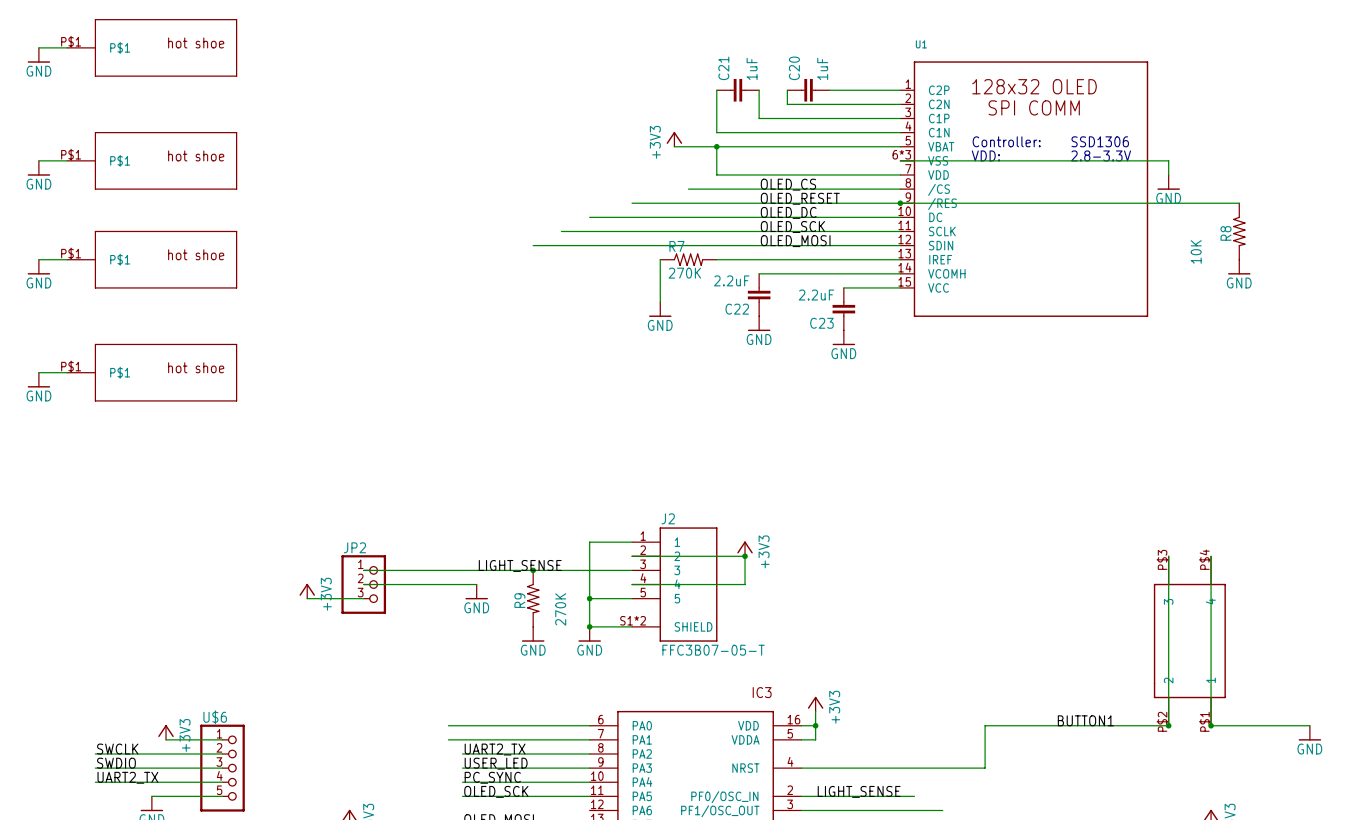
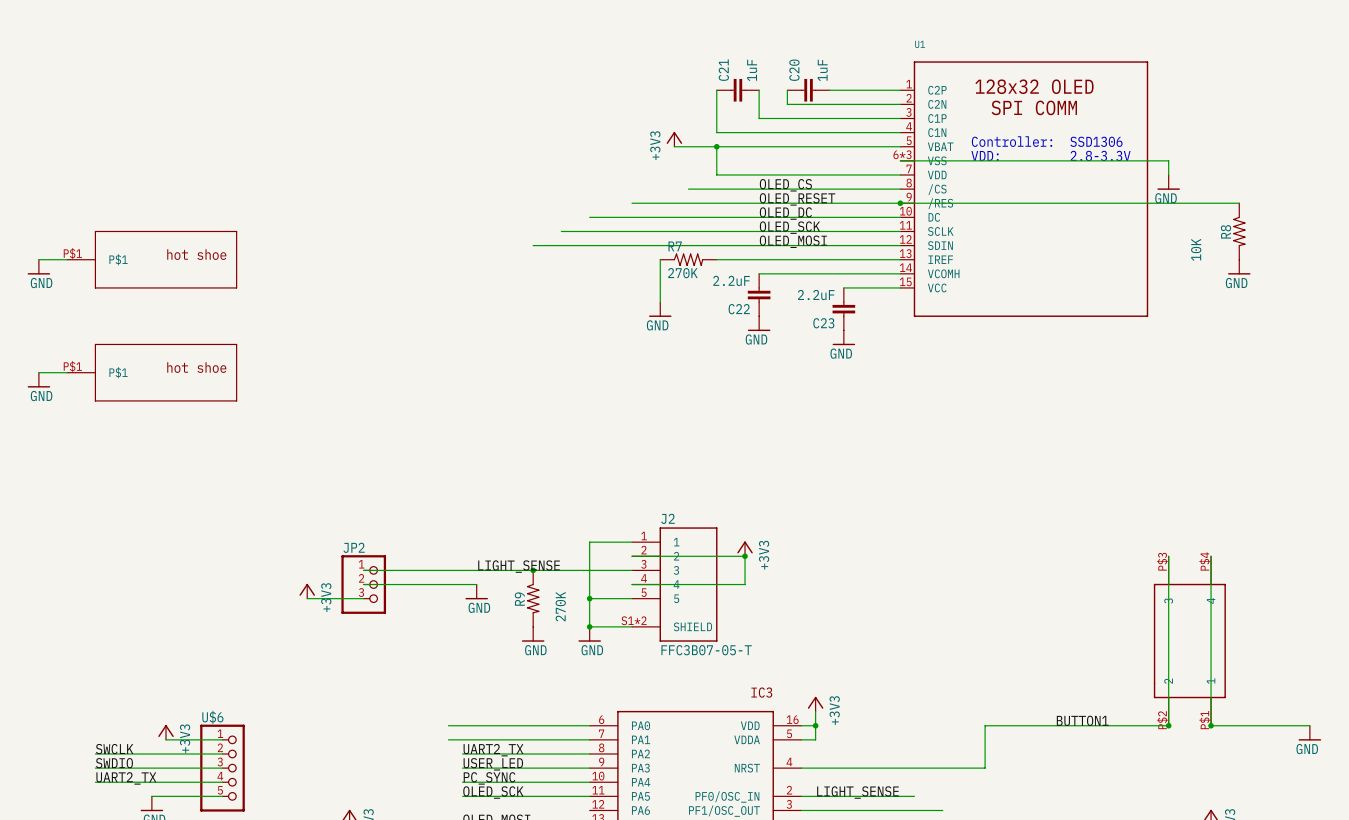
wire: (38, 47) (67, 47) -> none
part: (152, 47) -> none
power symbol: GND (38, 55) -> none
wire: (38, 160) (67, 160) -> none
part: (152, 160) -> none
power symbol: GND (38, 168) -> none

